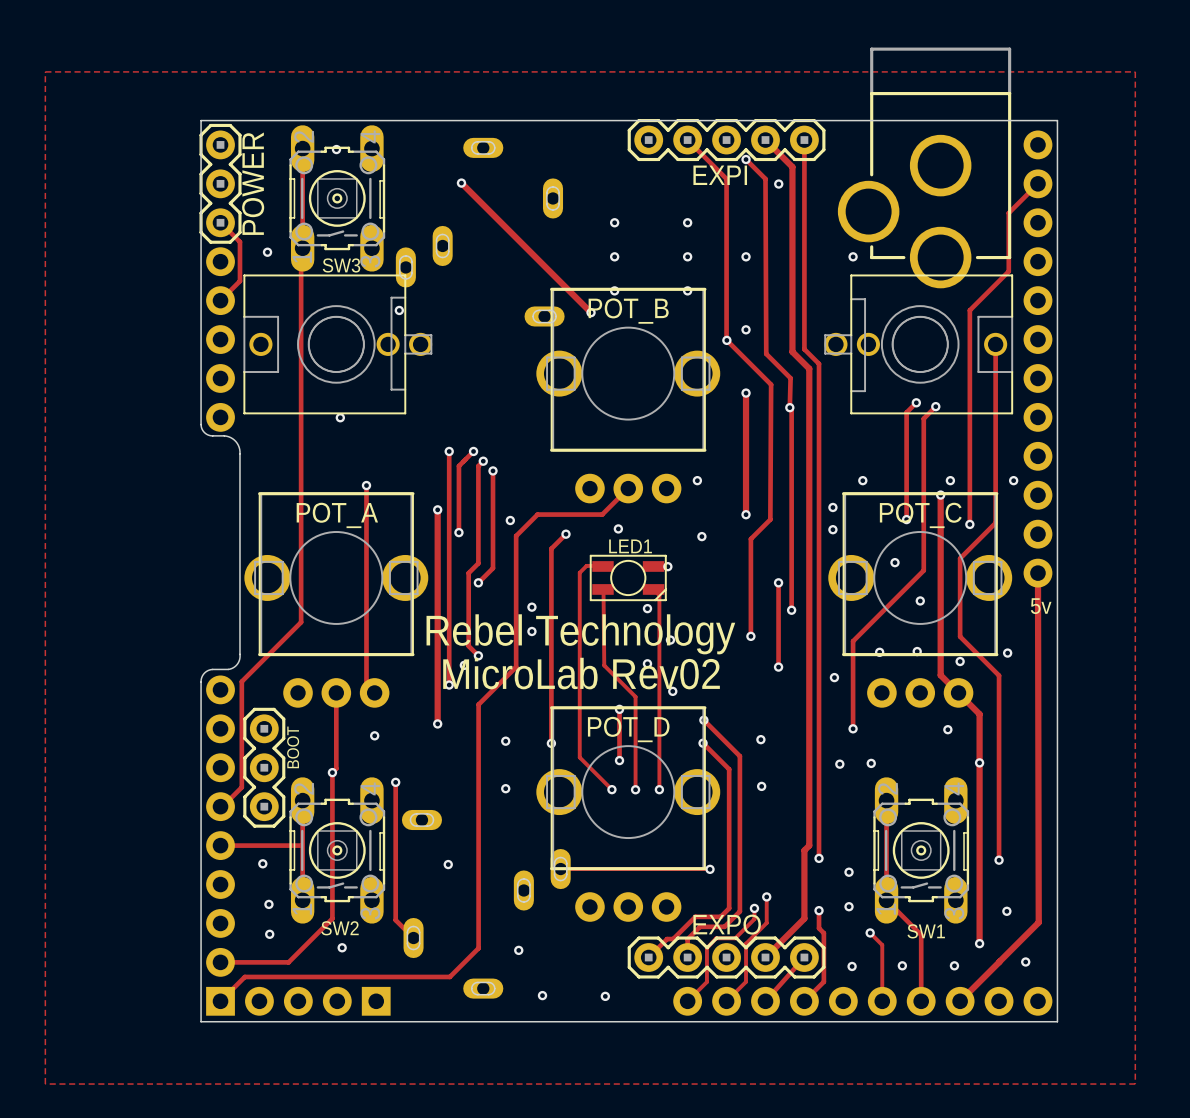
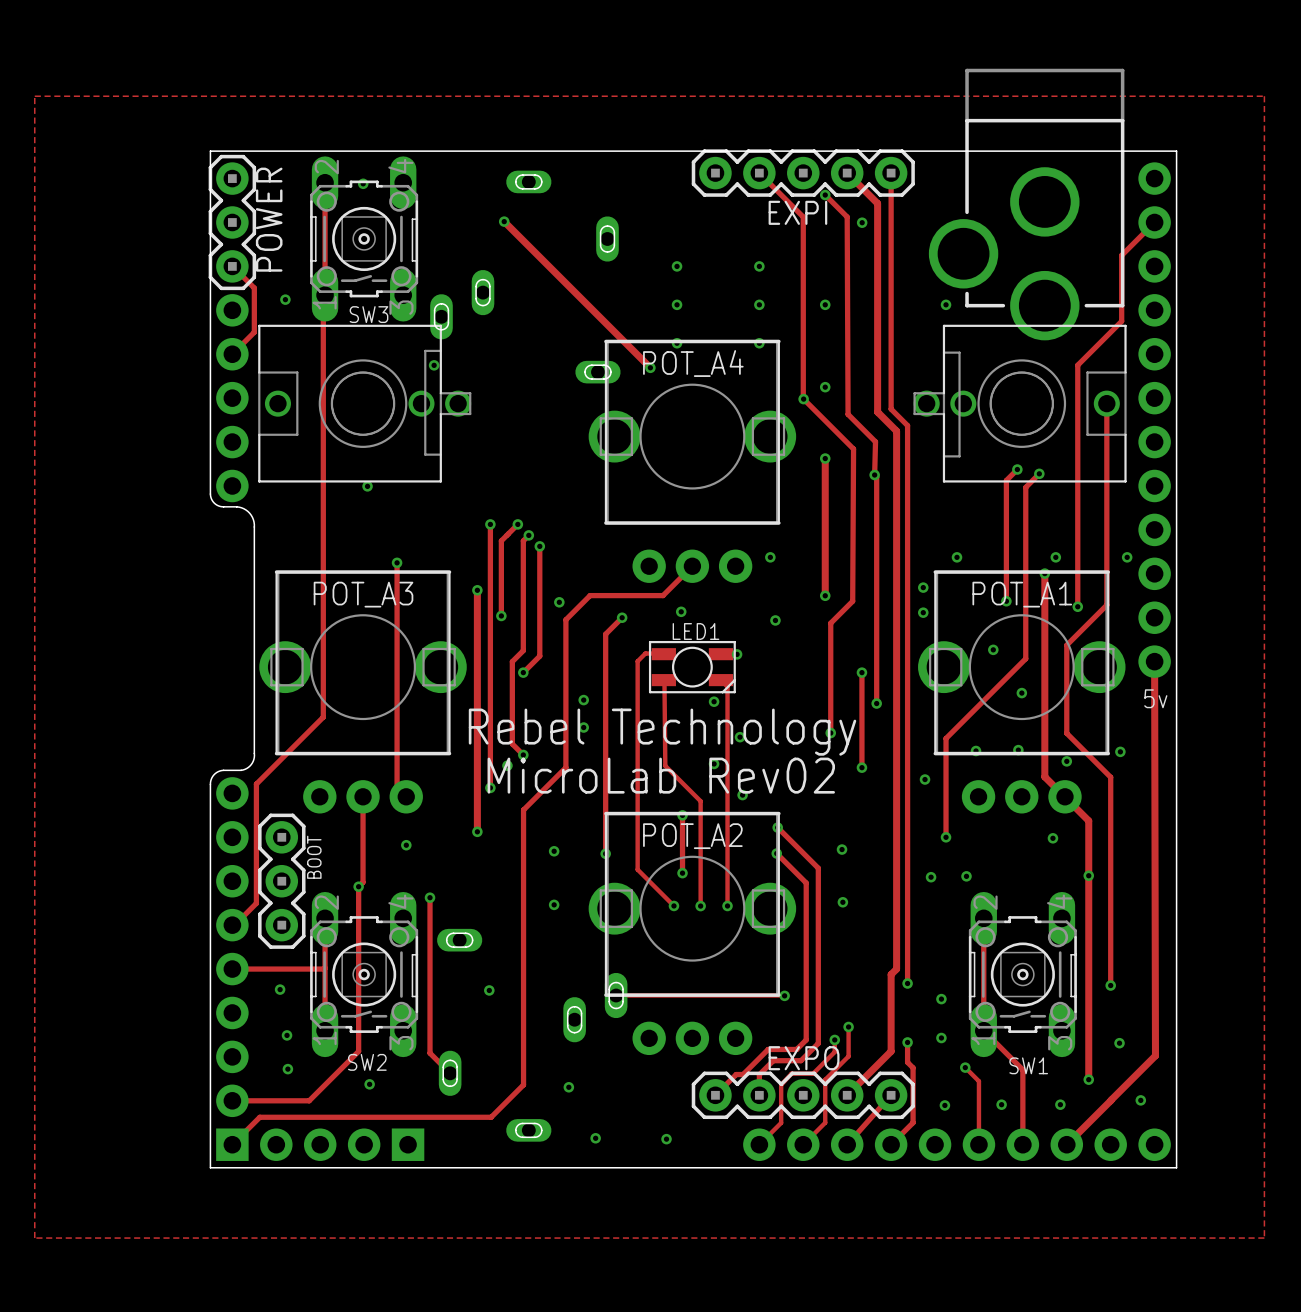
POT_B name: POT_B (628, 311) -> POT_A4 (693, 363)
POT_A name: POT_A (337, 515) -> POT_A3 (363, 594)
POT_C name: POT_C (920, 515) -> POT_A1 (1022, 594)
POT_D name: POT_D (628, 729) -> POT_A2 (692, 836)

